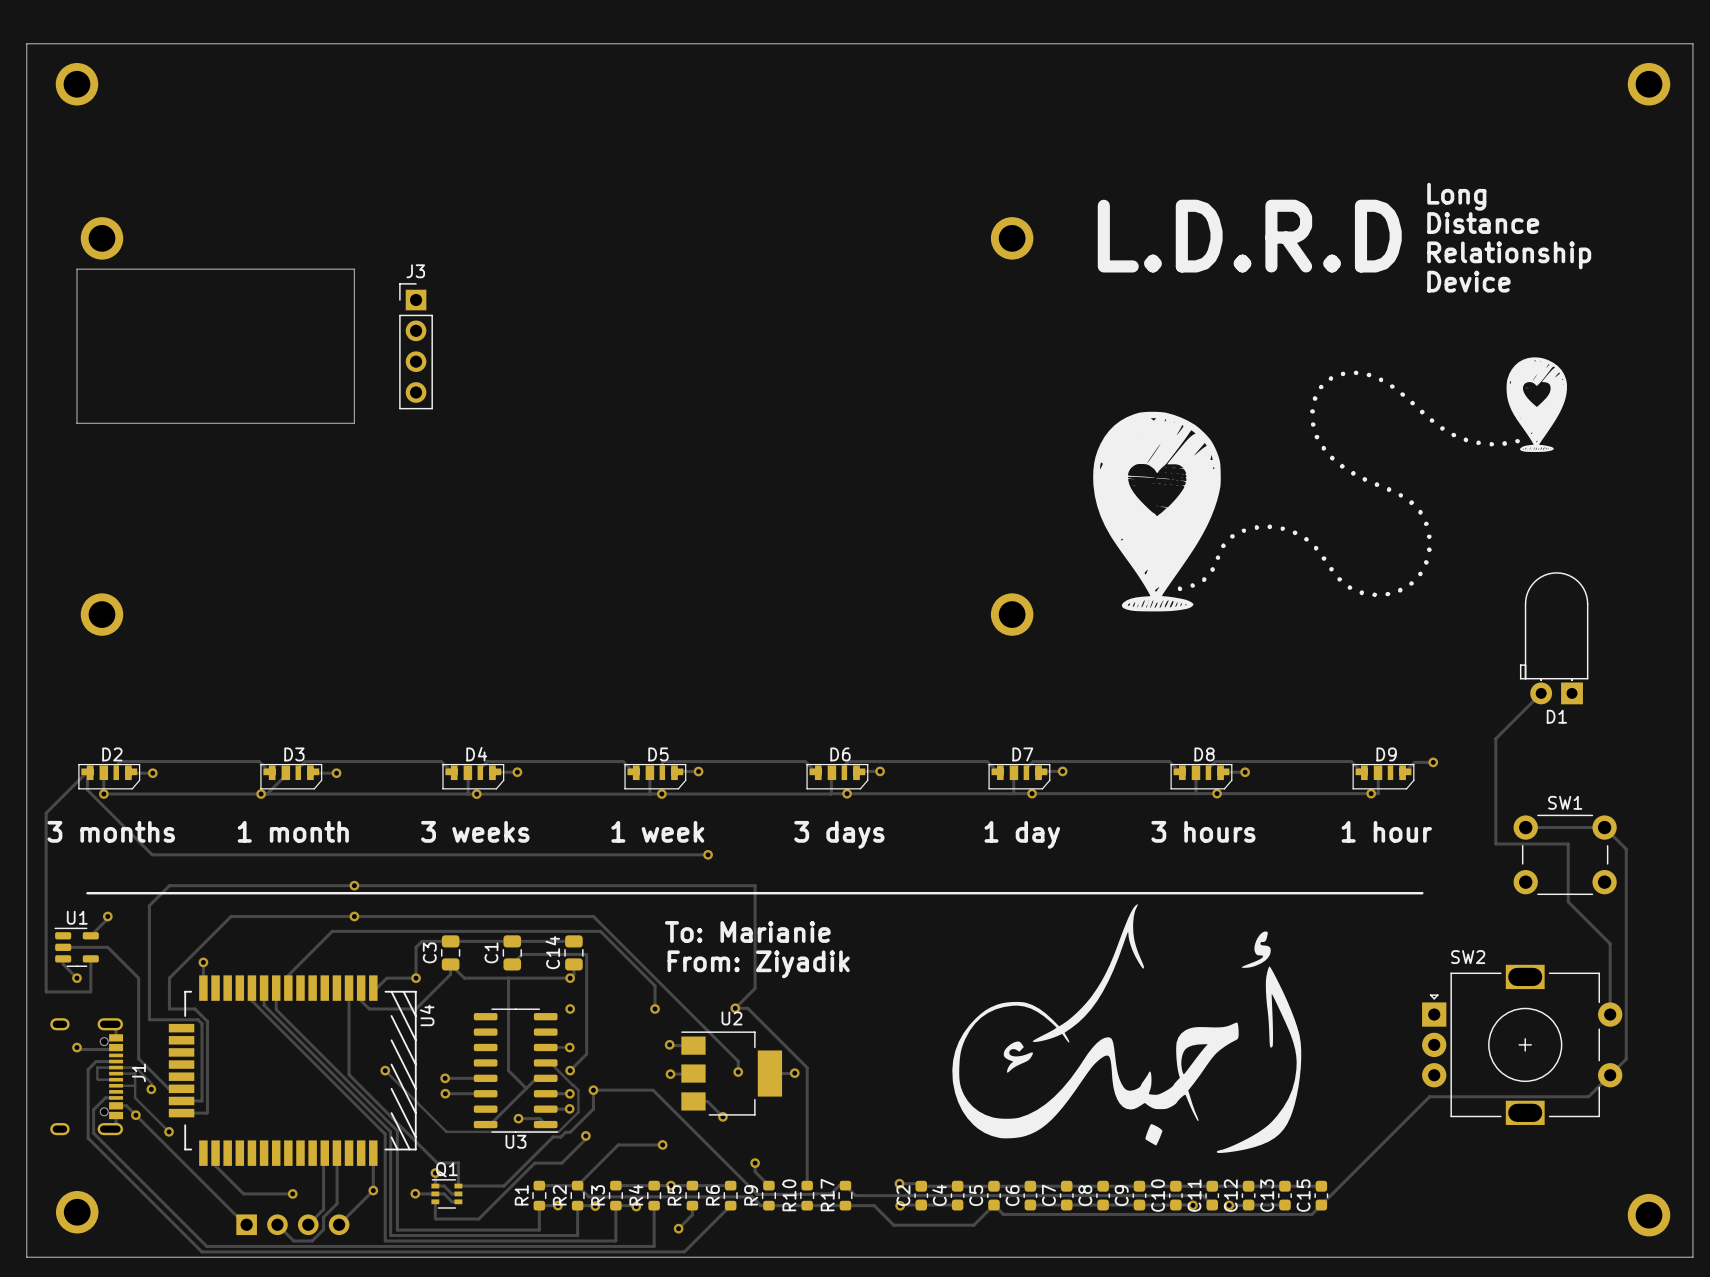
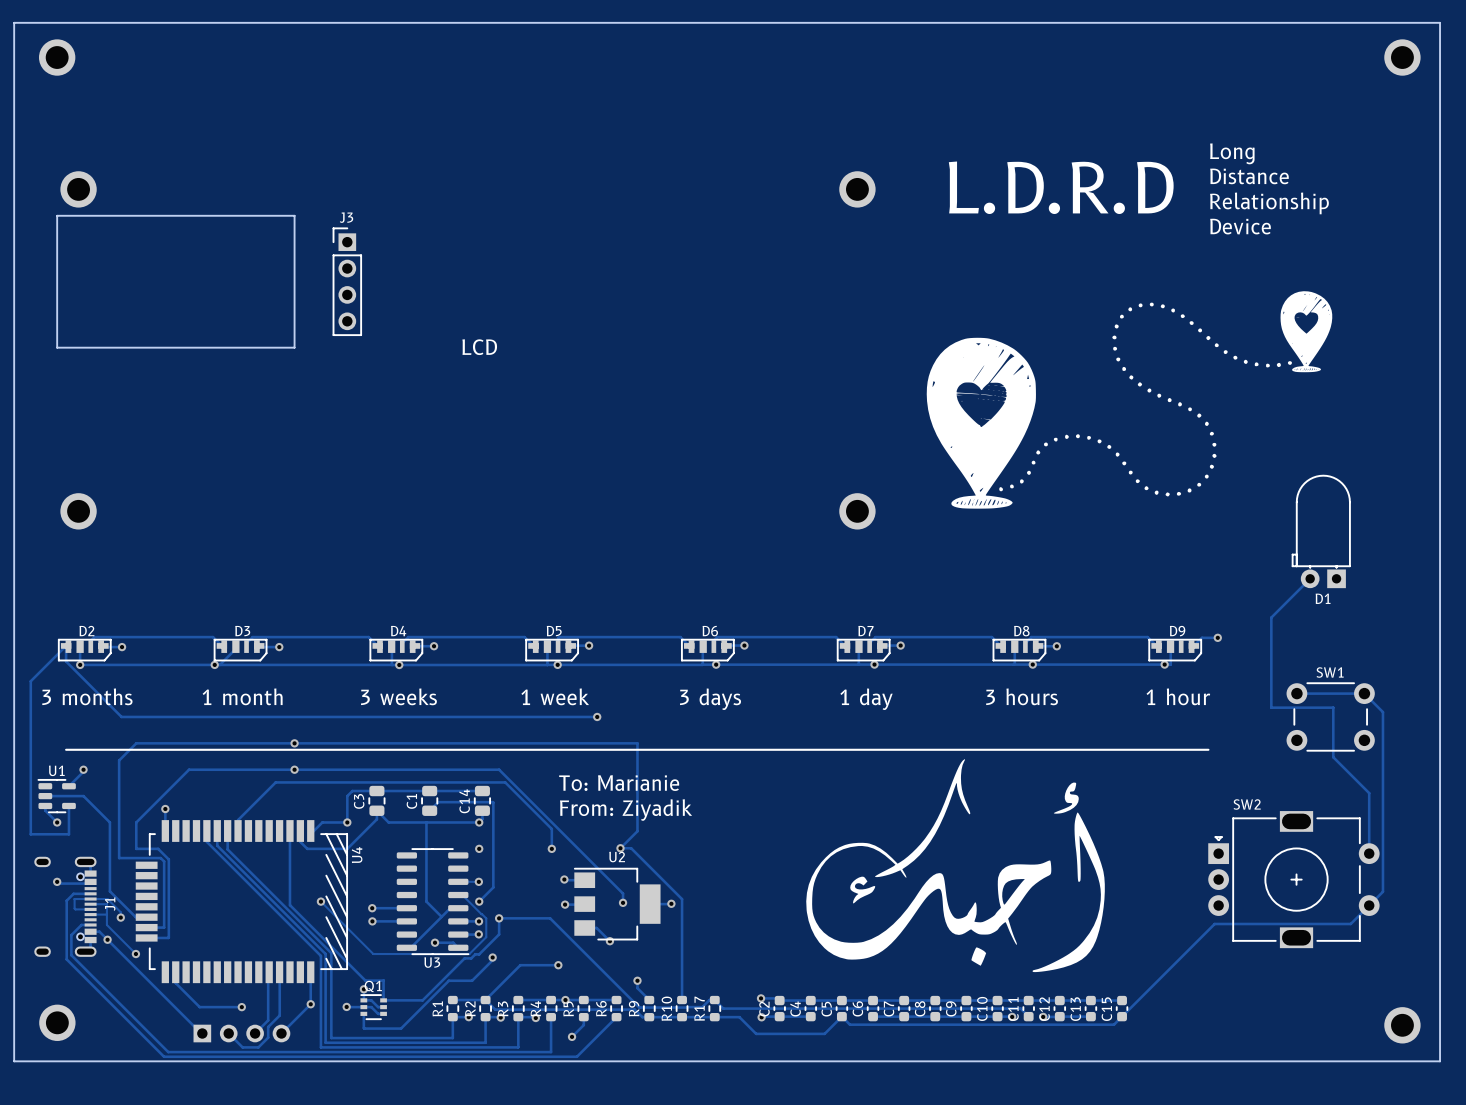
text: none -> LCD (479, 347)

